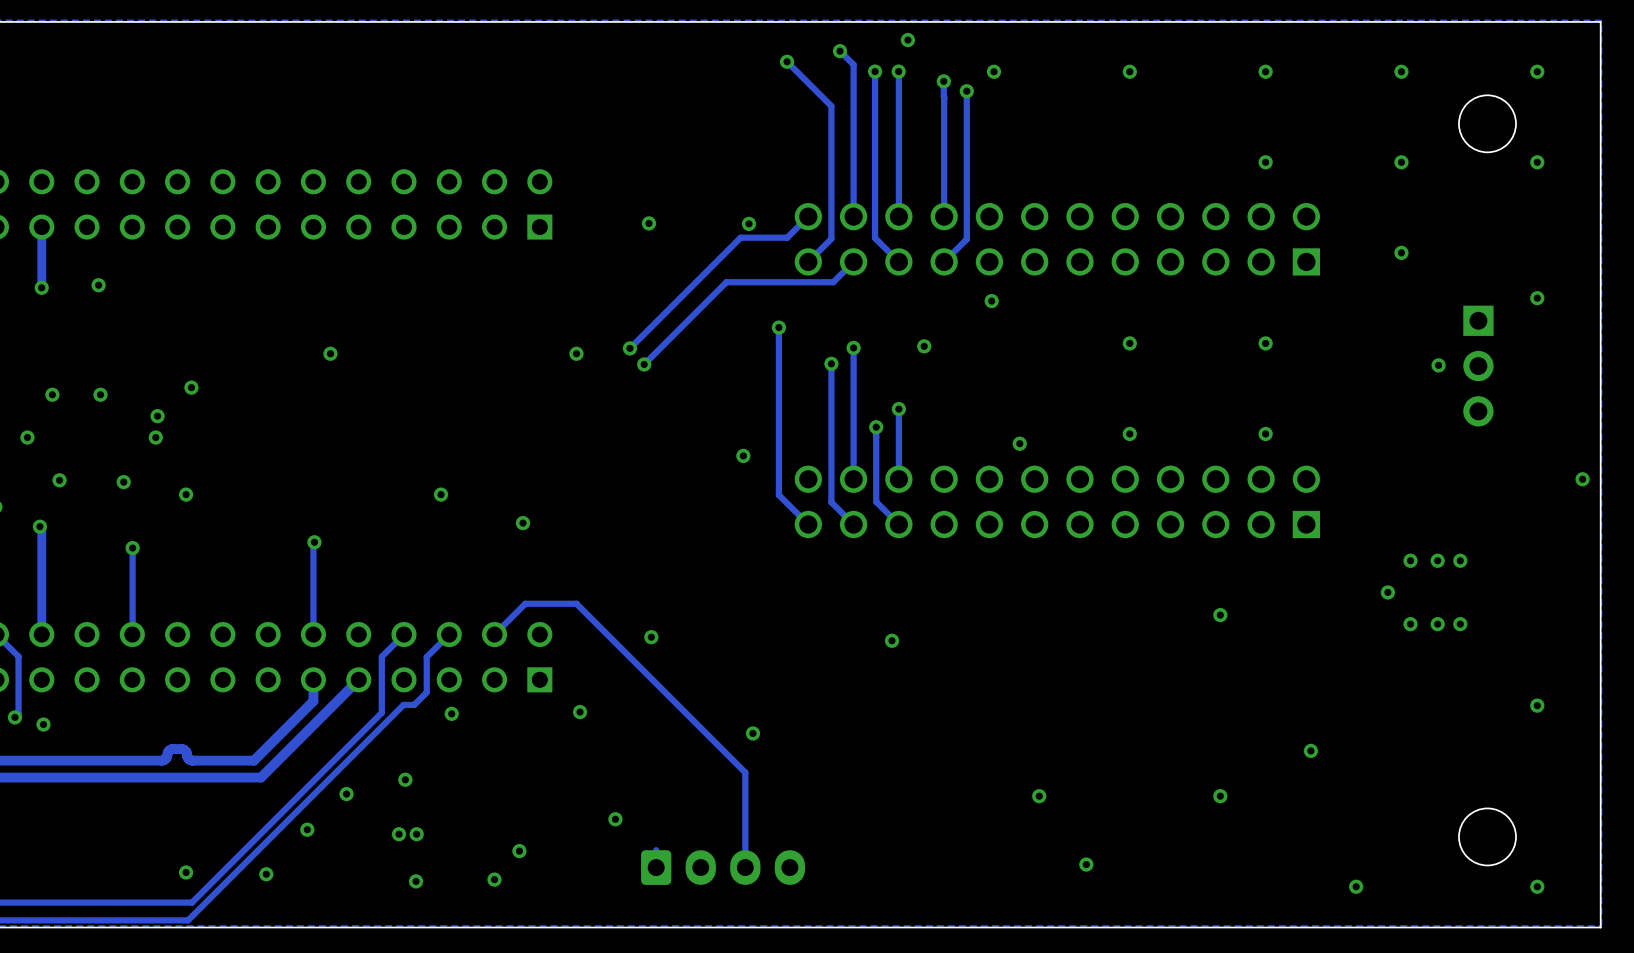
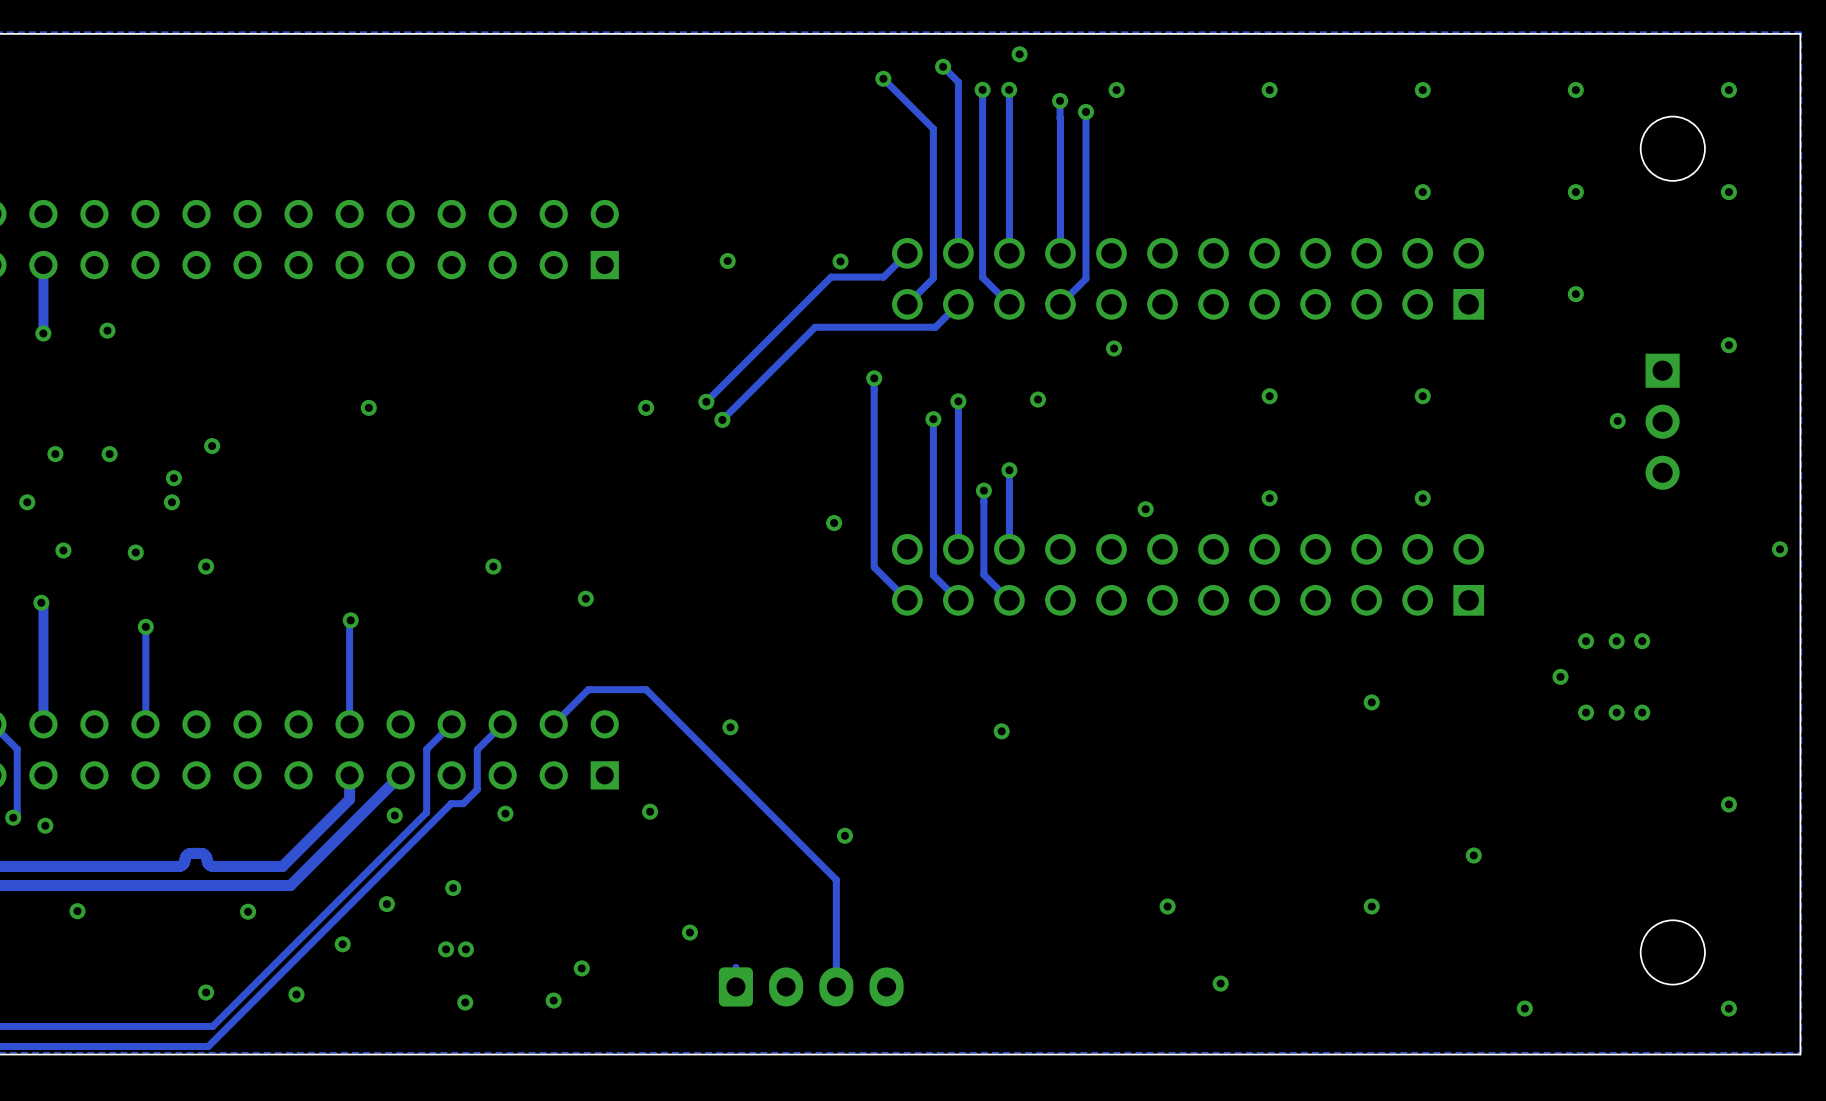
via: none -> (394, 815)
via: none -> (77, 911)
via: none -> (248, 911)

